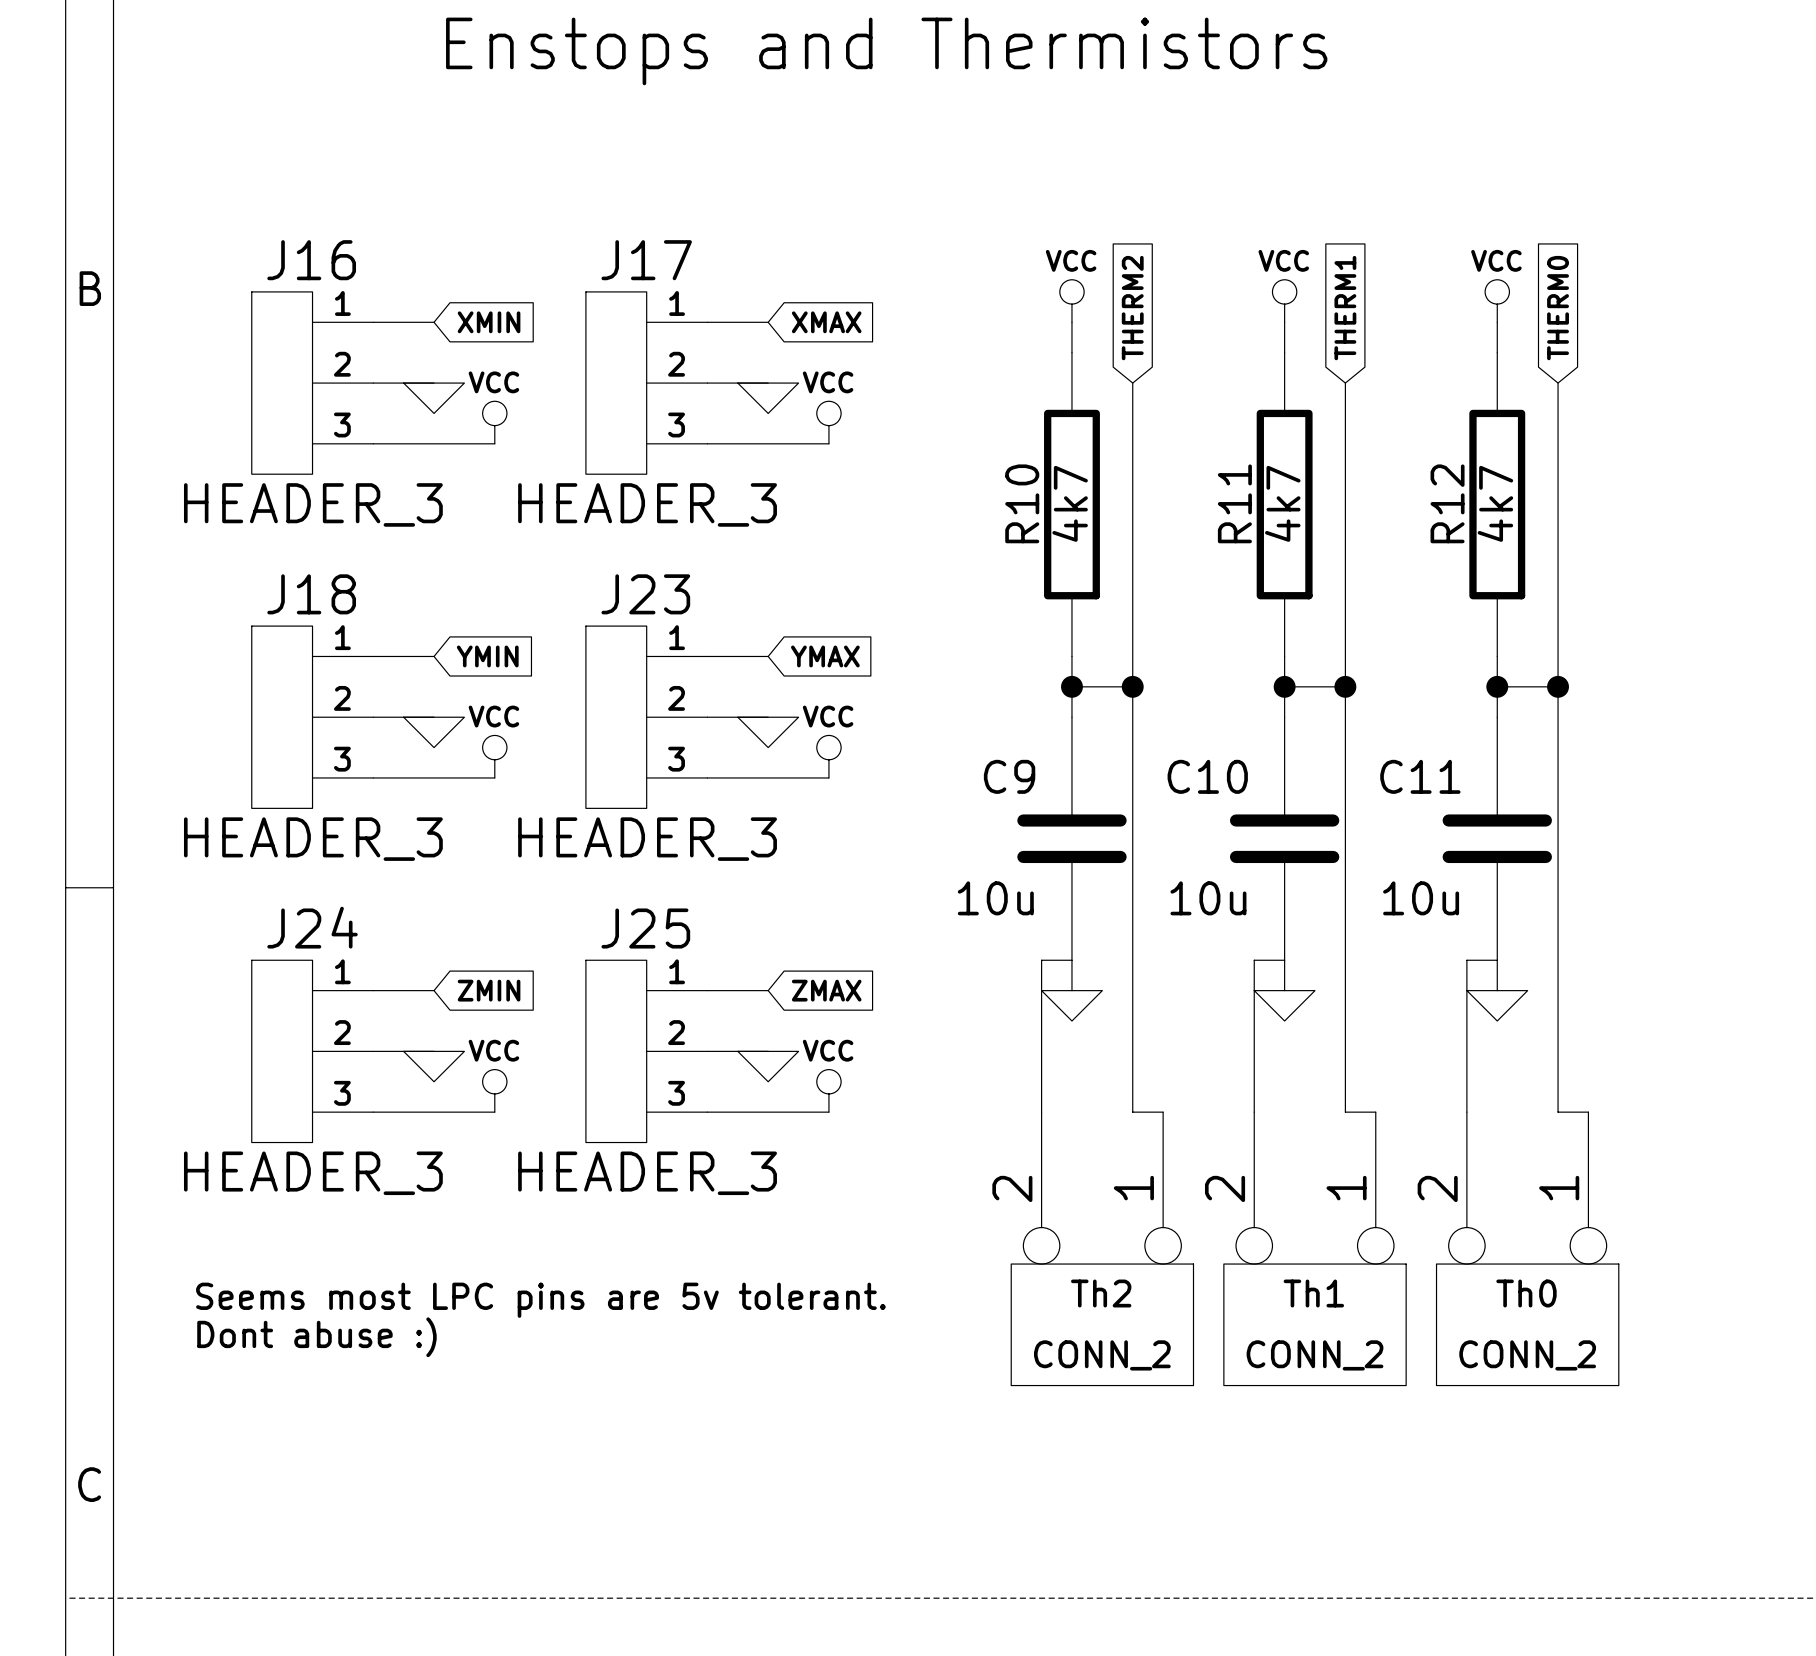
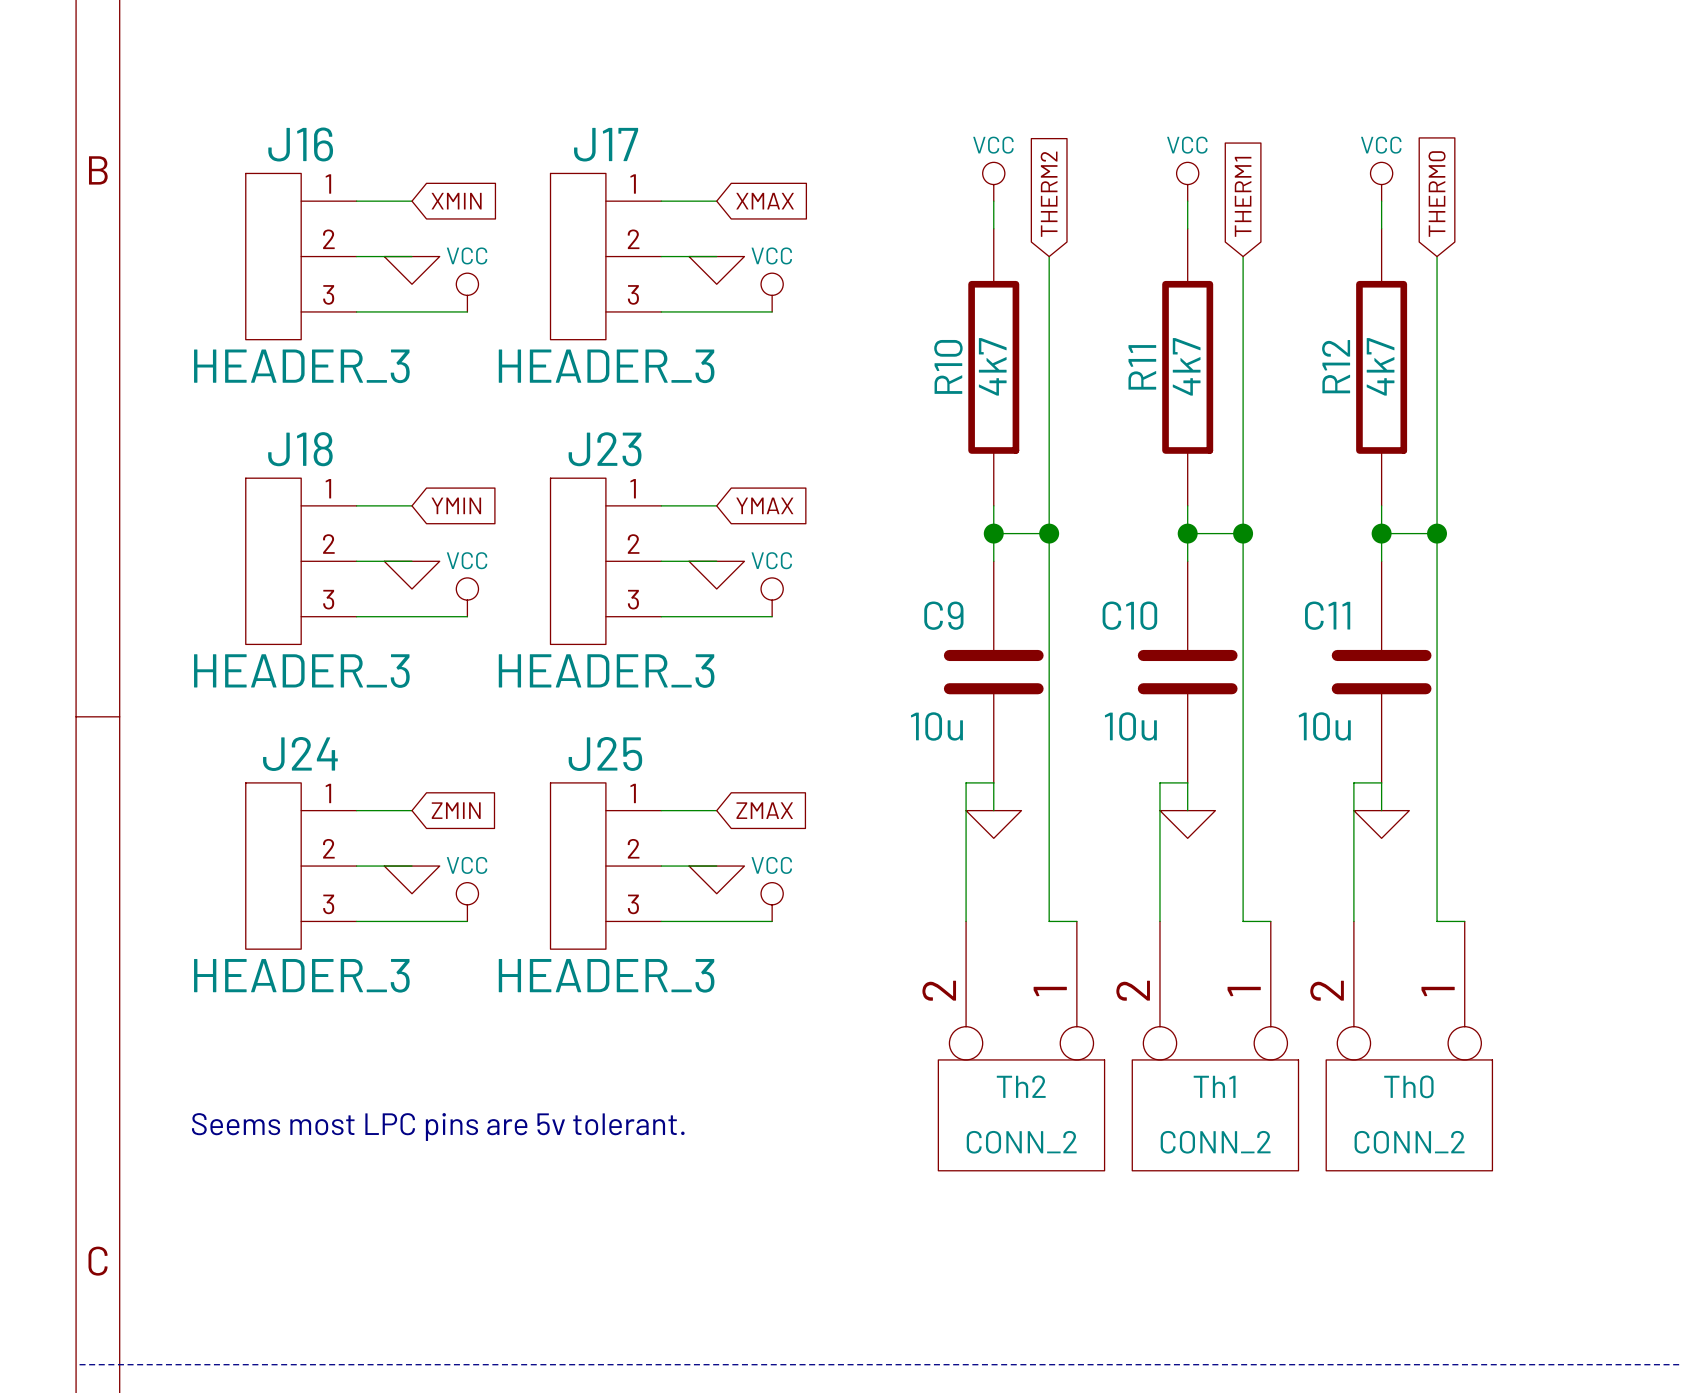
text: Seems most LPC pins are 5v tolerant. (540, 1300) -> none
text: Dont abuse :) (316, 1337) -> Seems most LPC pins are 5v tolerant. (438, 1127)

